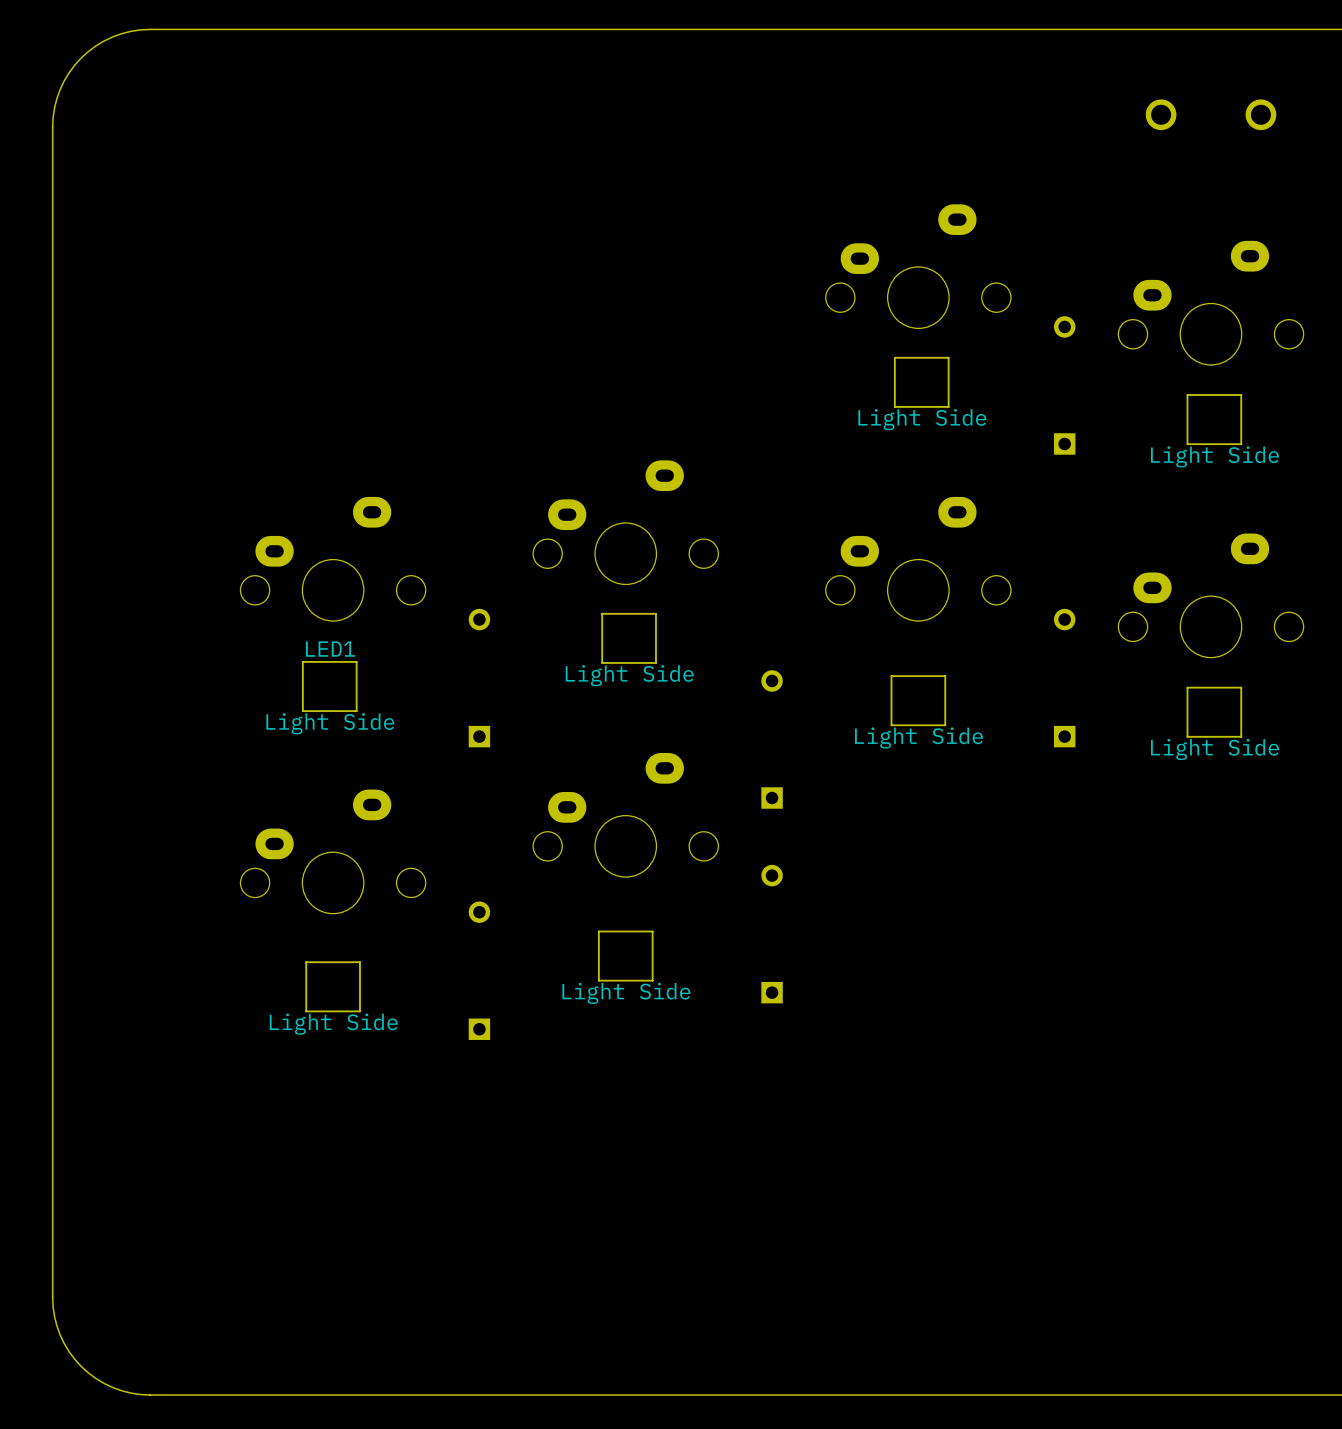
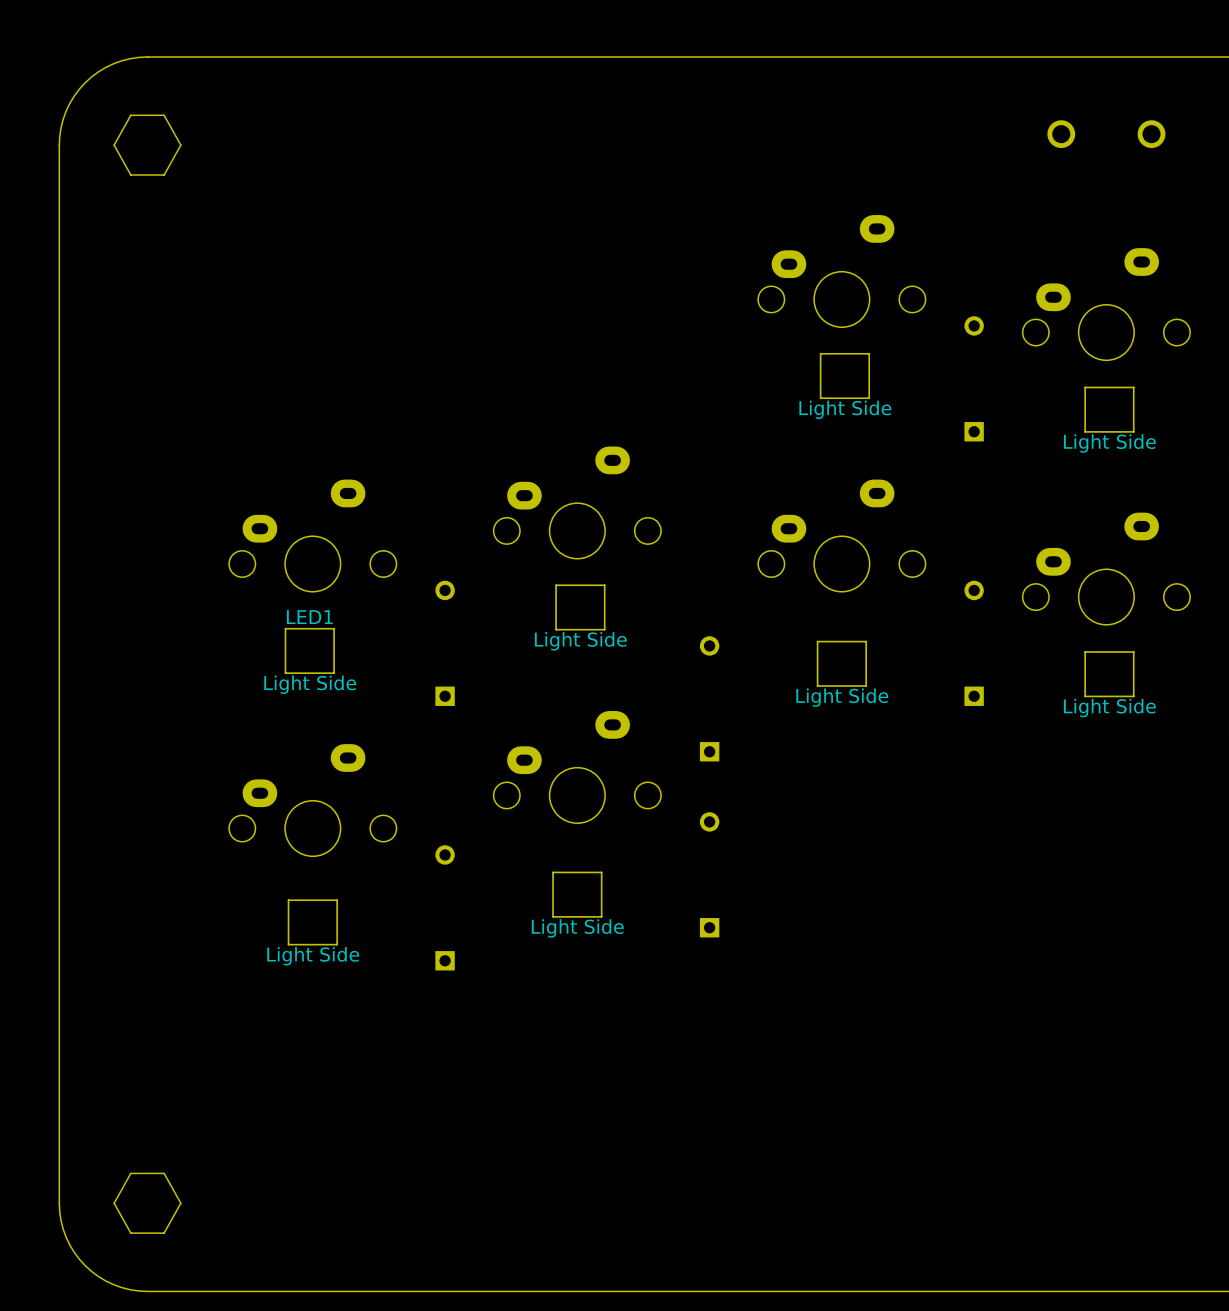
drawing: none -> [113, 114, 182, 176]
drawing: none -> [113, 1172, 182, 1234]

